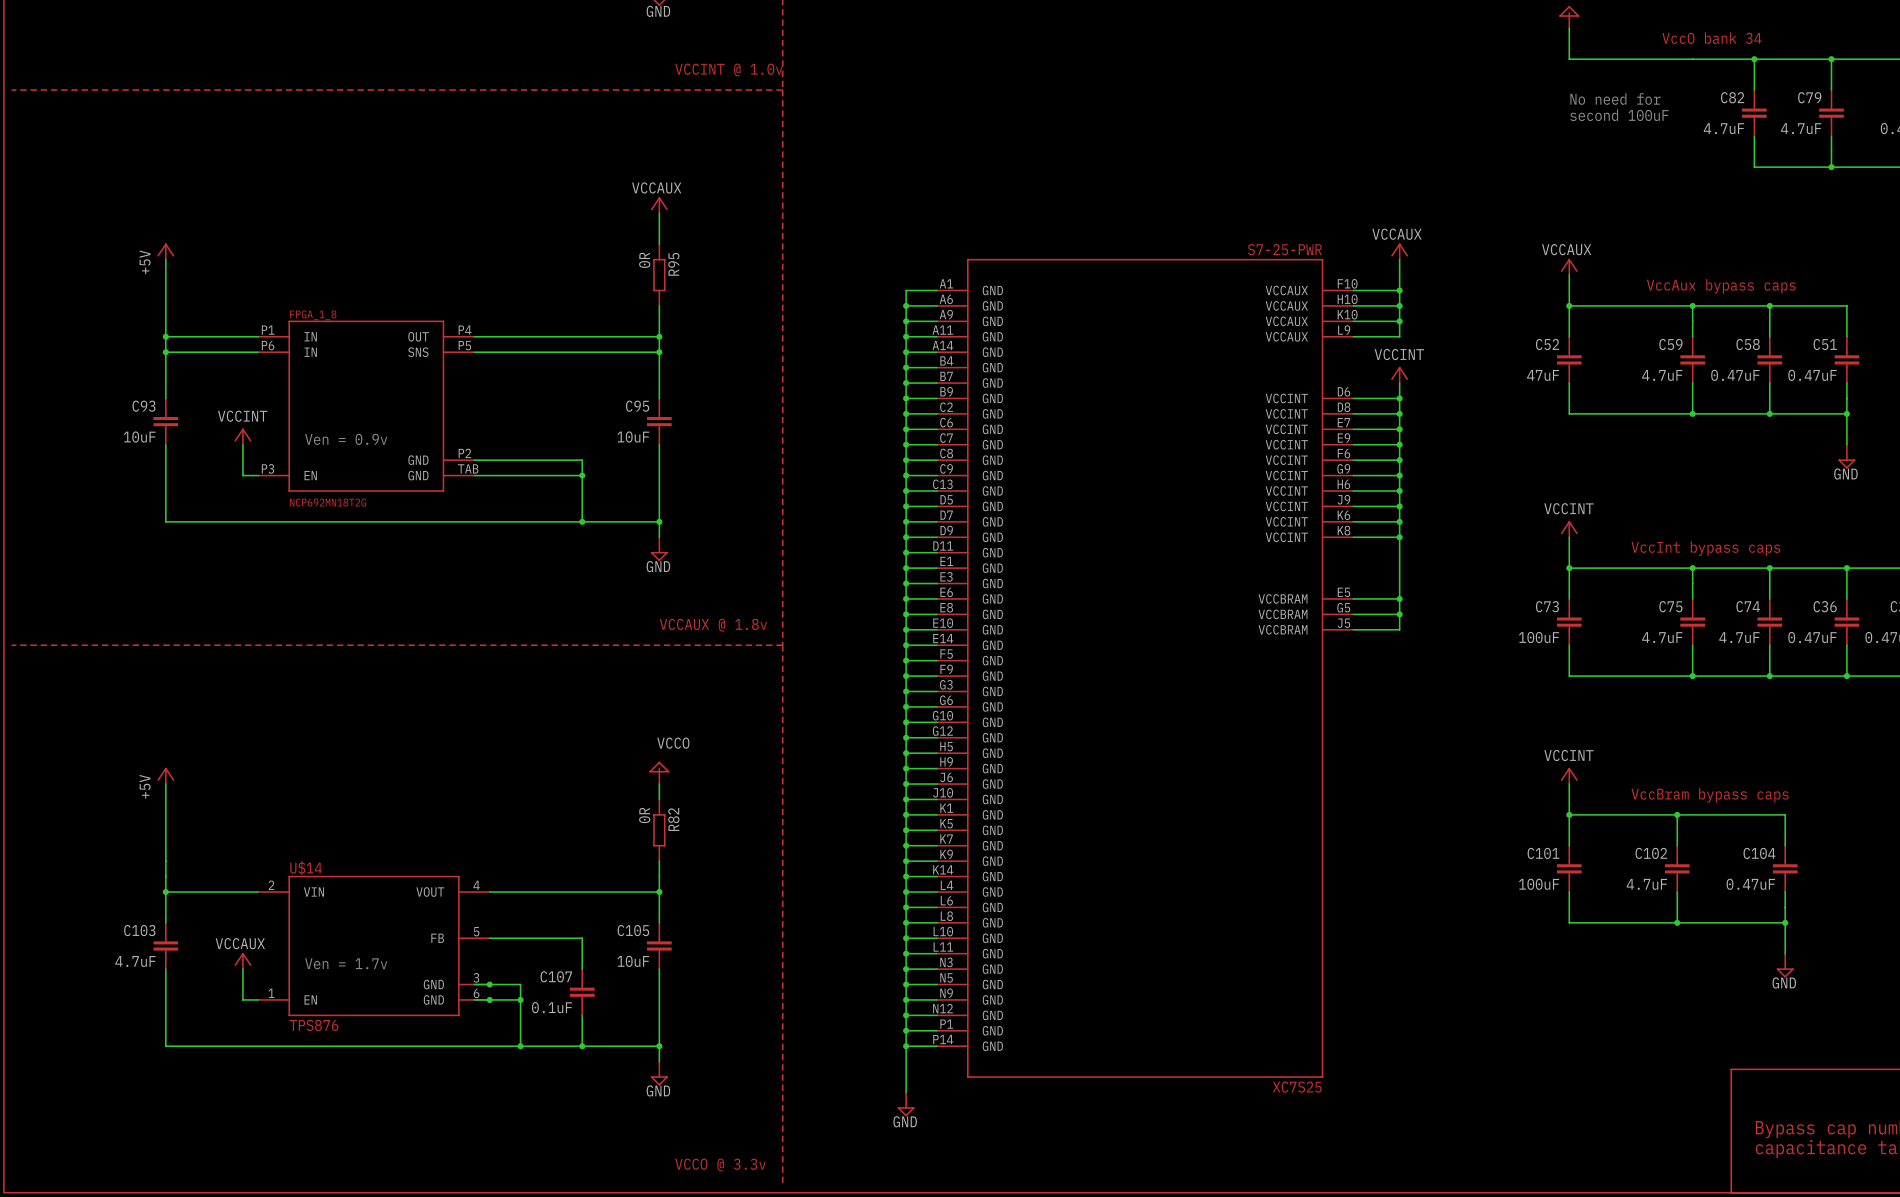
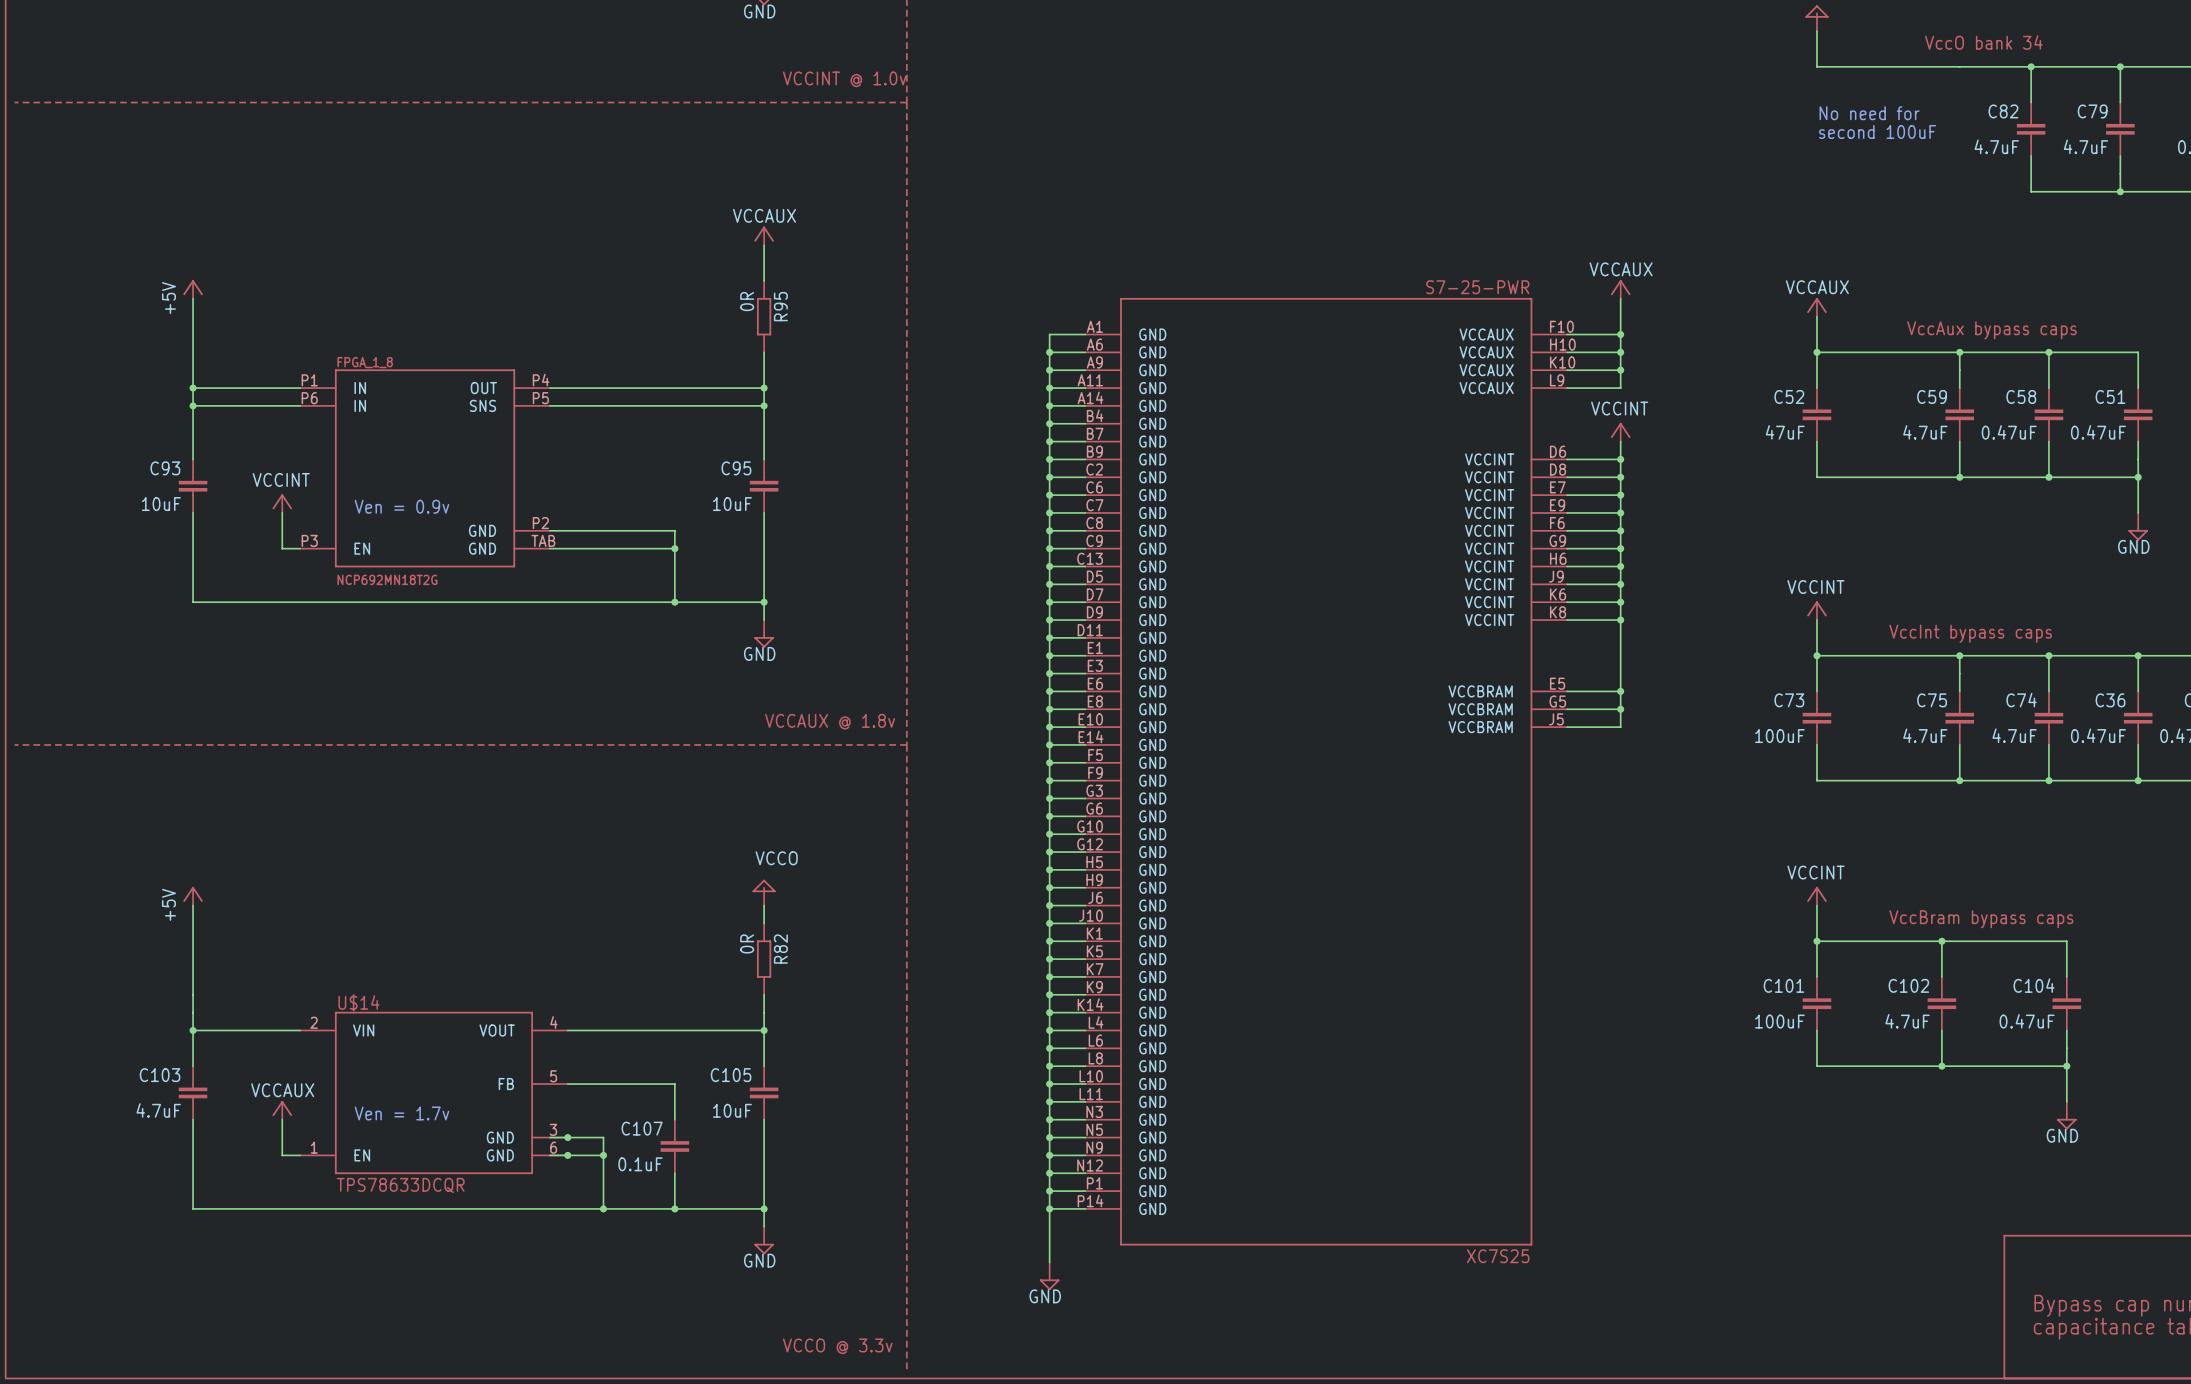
U$14 value: TPS876 (314, 1025) -> TPS78633DCQR (400, 1185)

